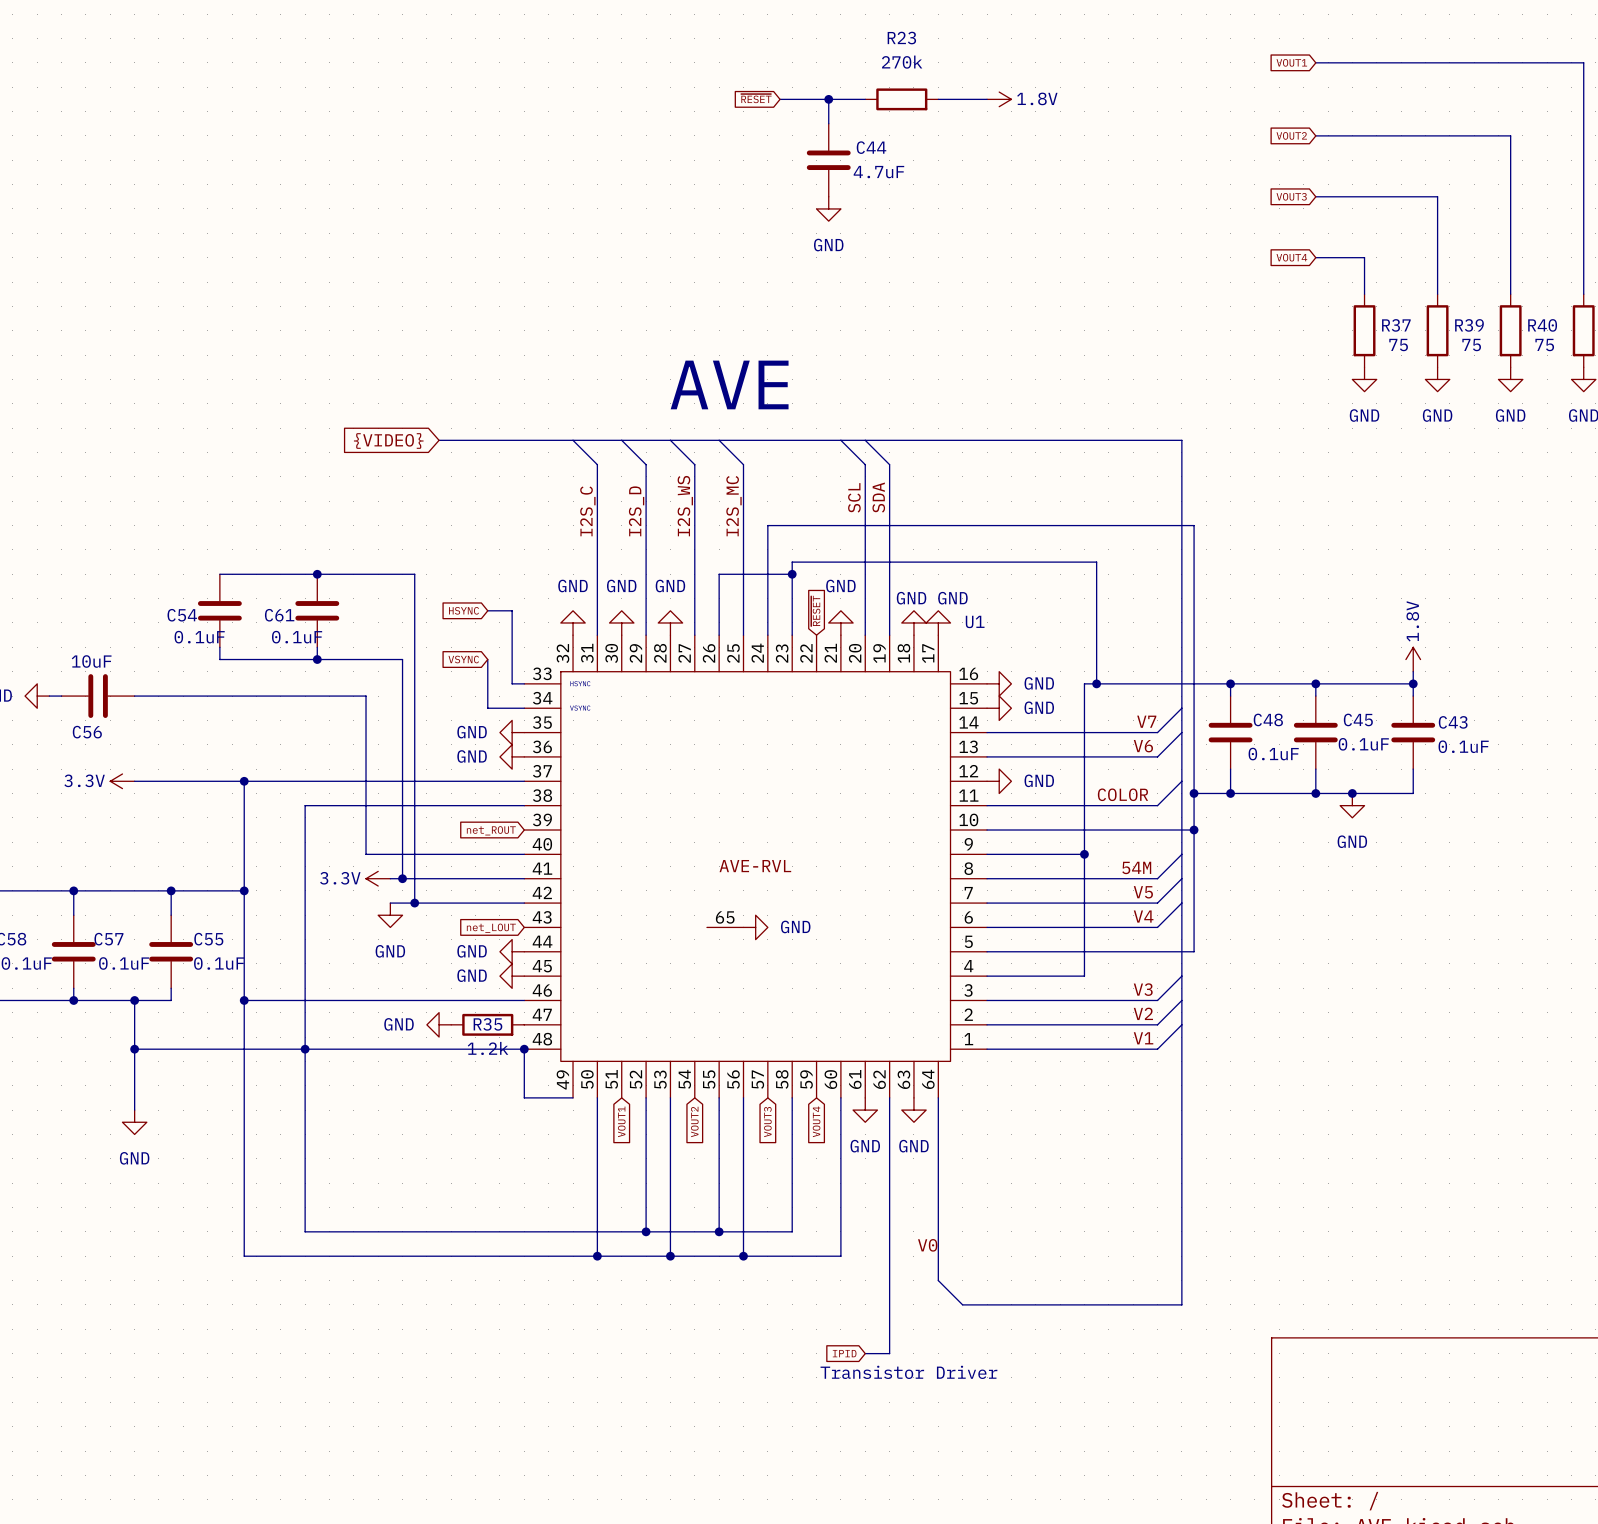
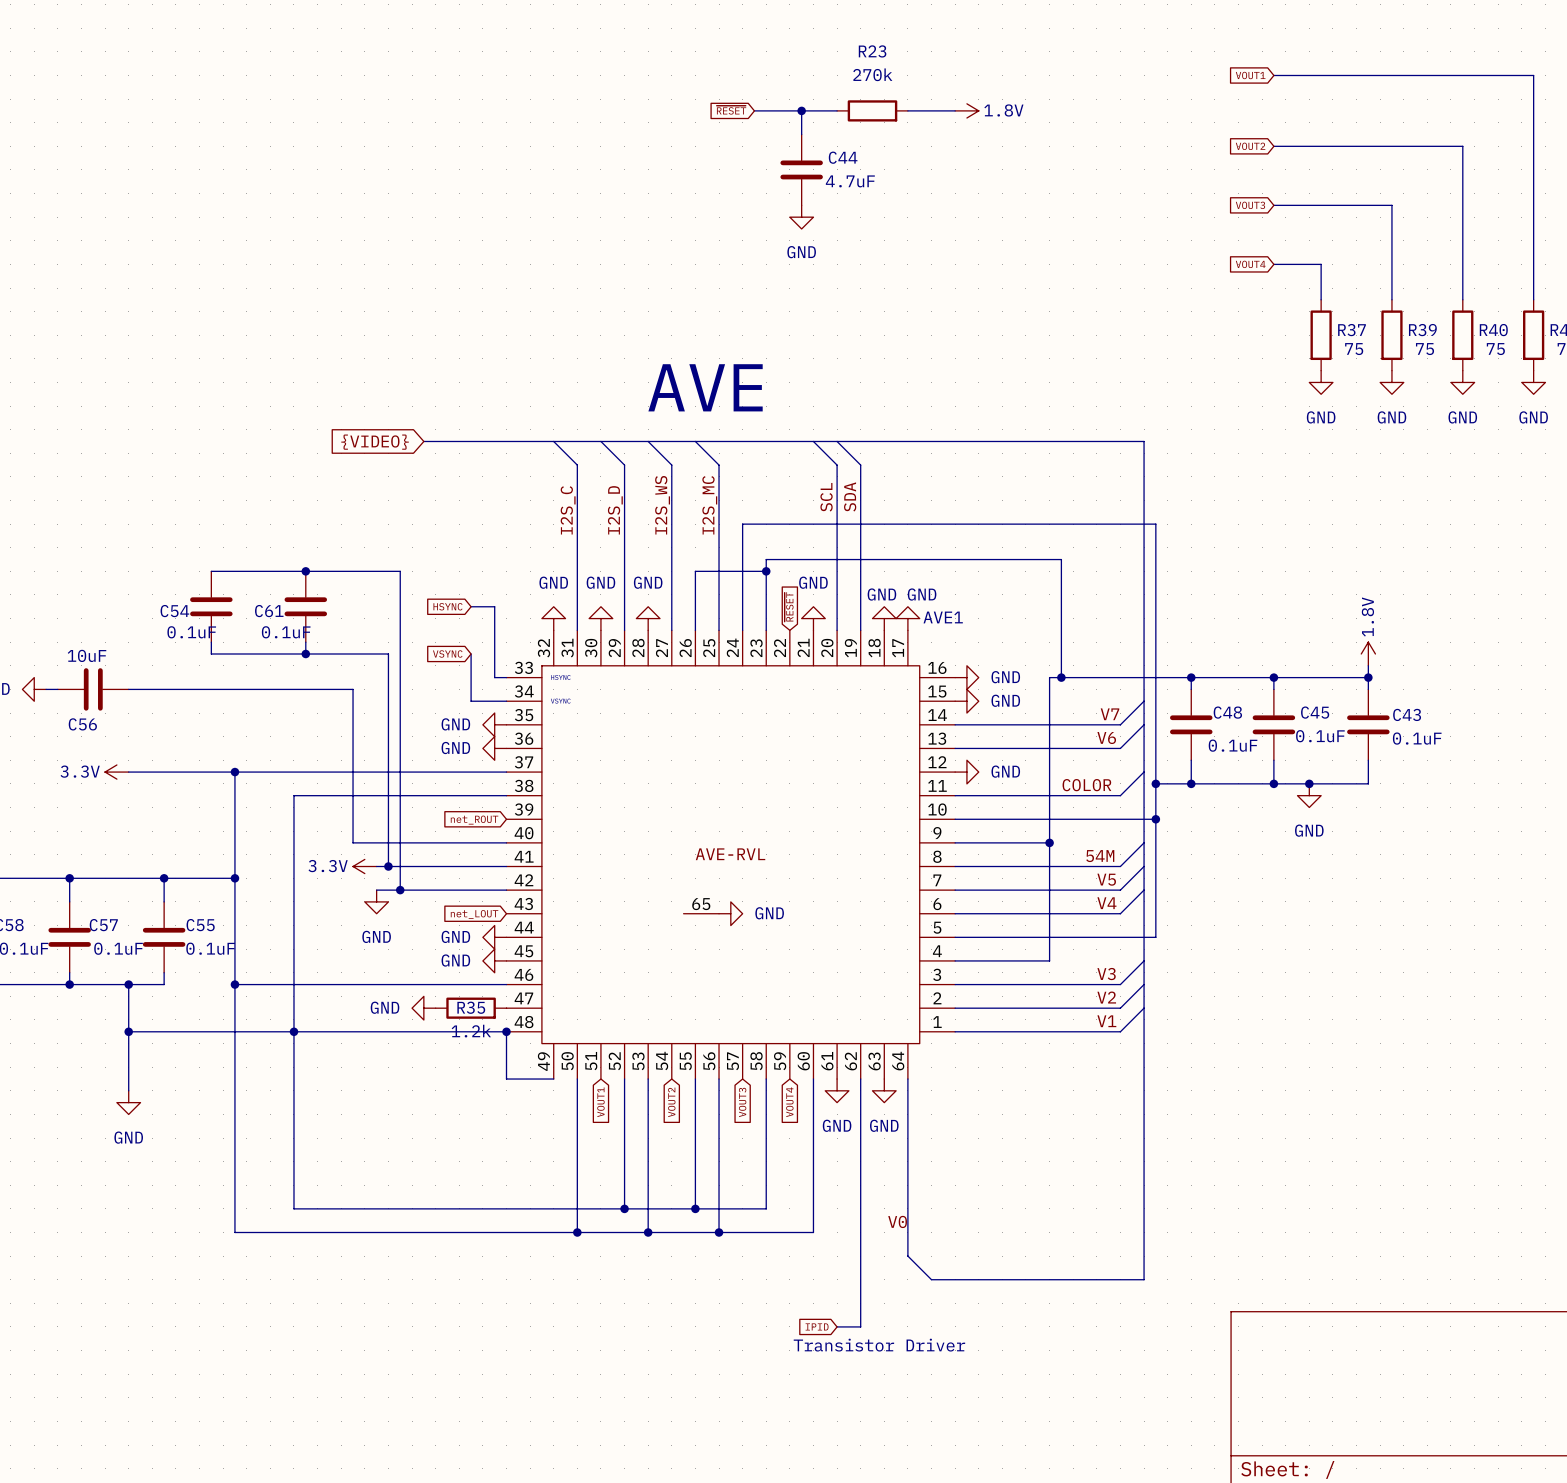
U1 name: U1 (975, 621) -> AVE1 (943, 617)

